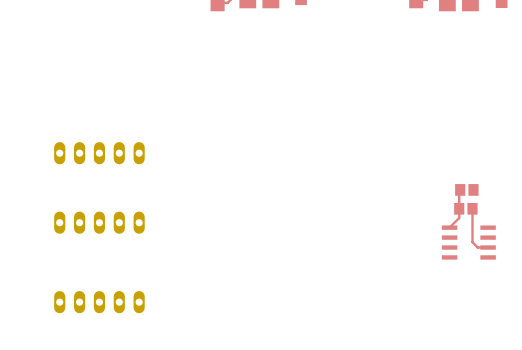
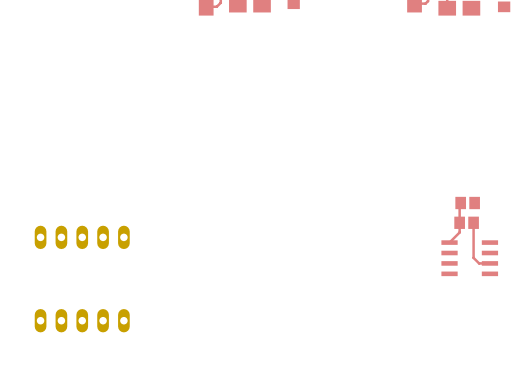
part: (99, 153) -> none

